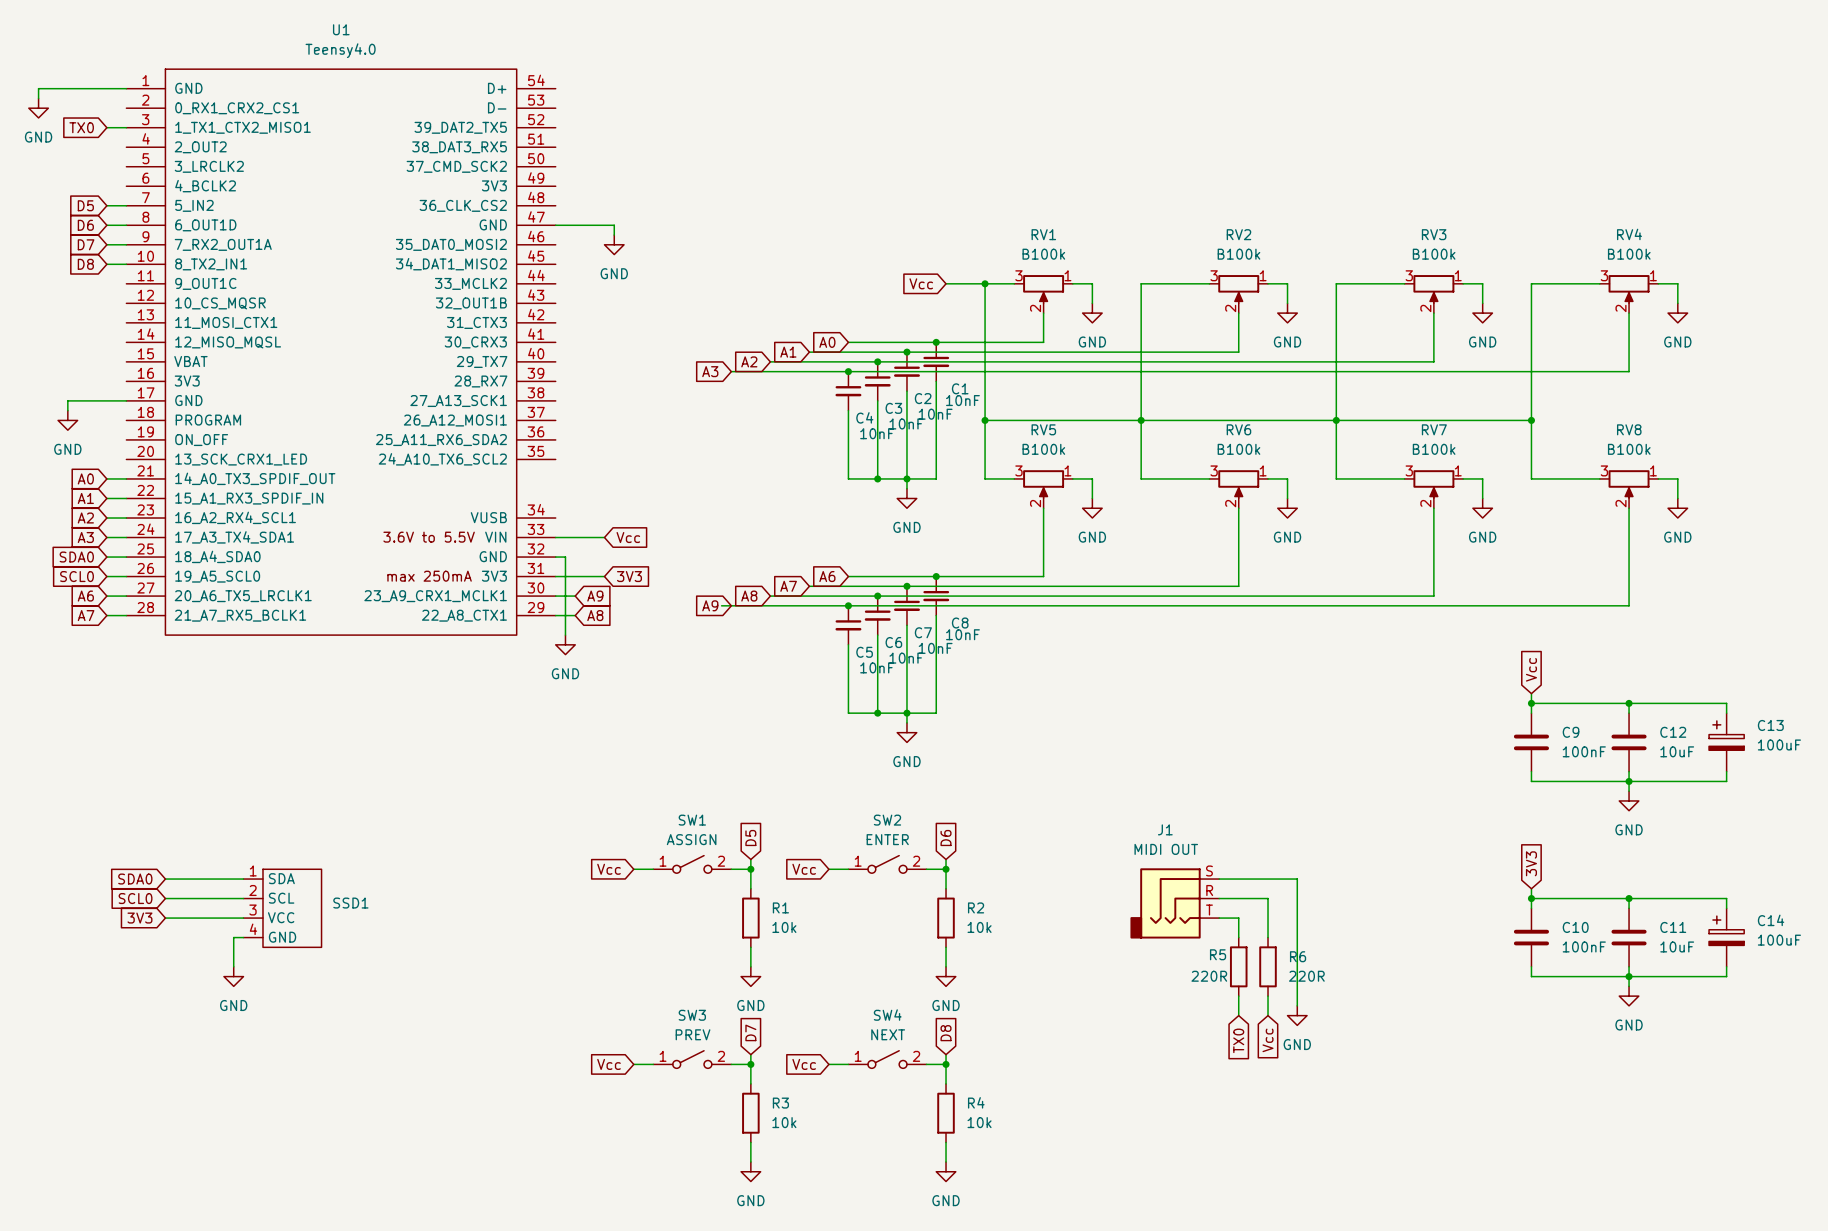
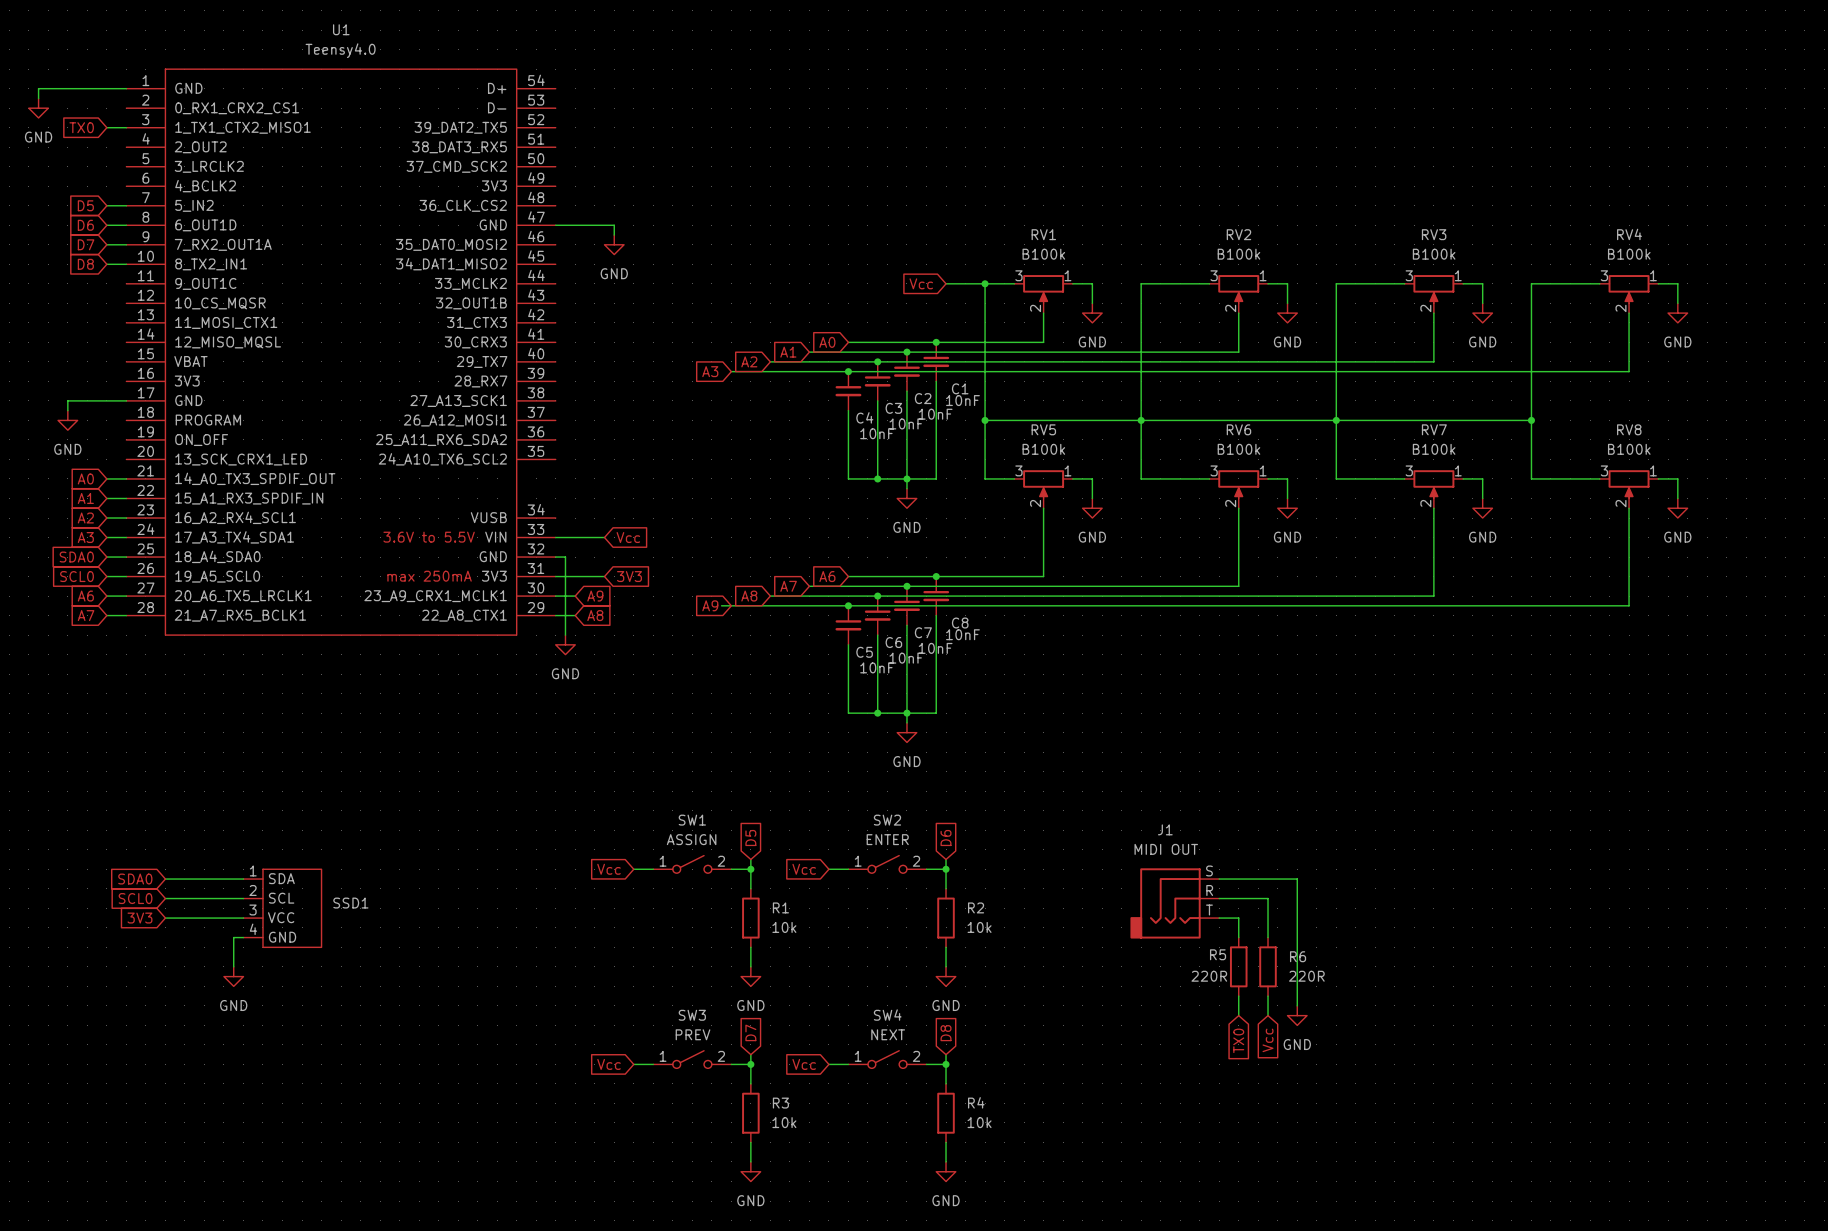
global label: Vcc (1531, 669) -> none
wire: (1531, 693) (1531, 713) -> none
wire: (1531, 703) (1726, 703) (1726, 713) -> none
junction: (1531, 703) -> none
wire: (1629, 703) (1629, 713) -> none
junction: (1629, 703) -> none
C9: 100nF (1531, 742) -> none
C12: 10uF (1629, 742) -> none
C13: 100uF (1726, 742) -> none
wire: (1531, 771) (1531, 781) (1726, 781) (1726, 771) -> none
wire: (1629, 771) (1629, 791) -> none
junction: (1629, 781) -> none
power symbol: GND (1629, 800) -> none
global label: 3V3 (1531, 863) -> none
wire: (1531, 888) (1531, 908) -> none
wire: (1531, 898) (1726, 898) (1726, 908) -> none
junction: (1531, 898) -> none
wire: (1629, 898) (1629, 908) -> none
junction: (1629, 898) -> none
C10: 100nF (1531, 937) -> none
C11: 10uF (1629, 937) -> none
C14: 100uF (1726, 937) -> none
wire: (1531, 966) (1531, 976) (1726, 976) (1726, 966) -> none
wire: (1629, 966) (1629, 986) -> none
junction: (1629, 976) -> none
power symbol: GND (1629, 996) -> none

